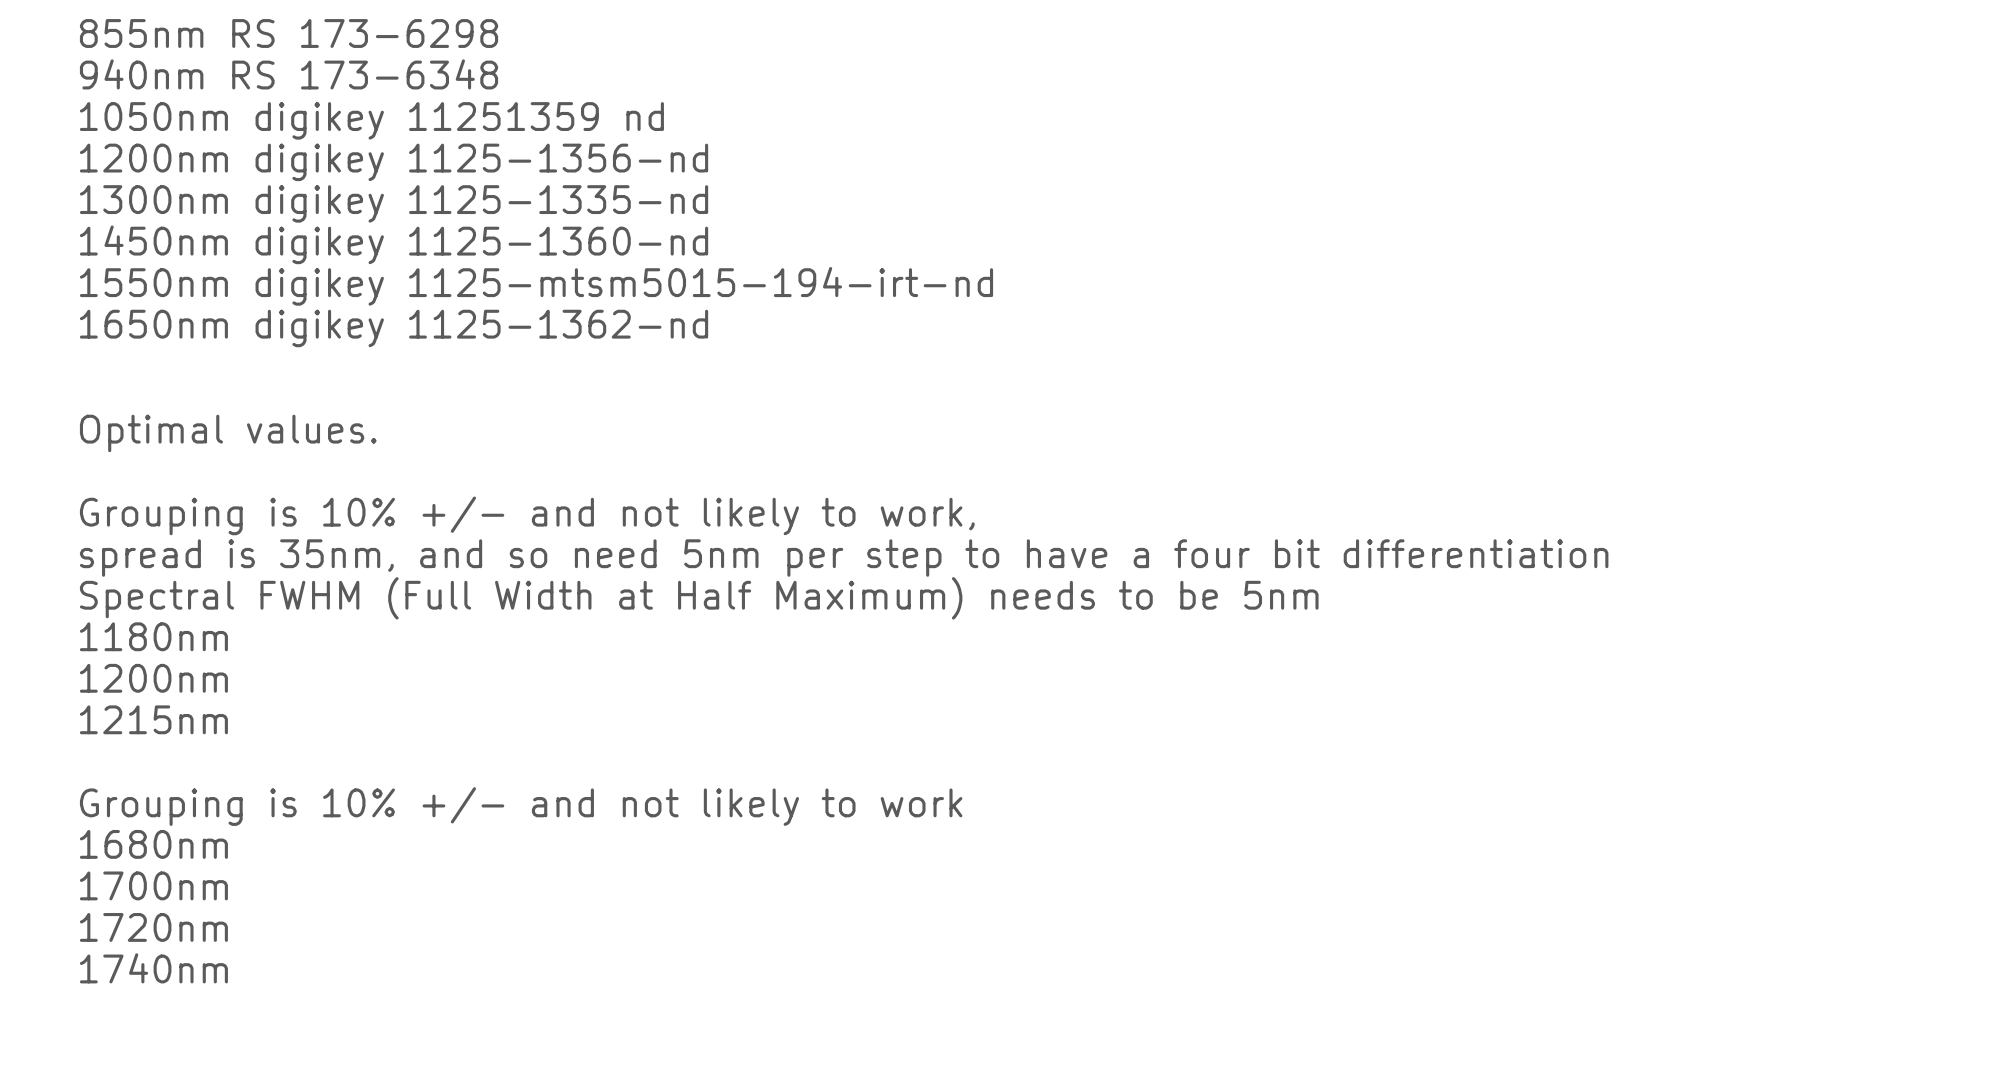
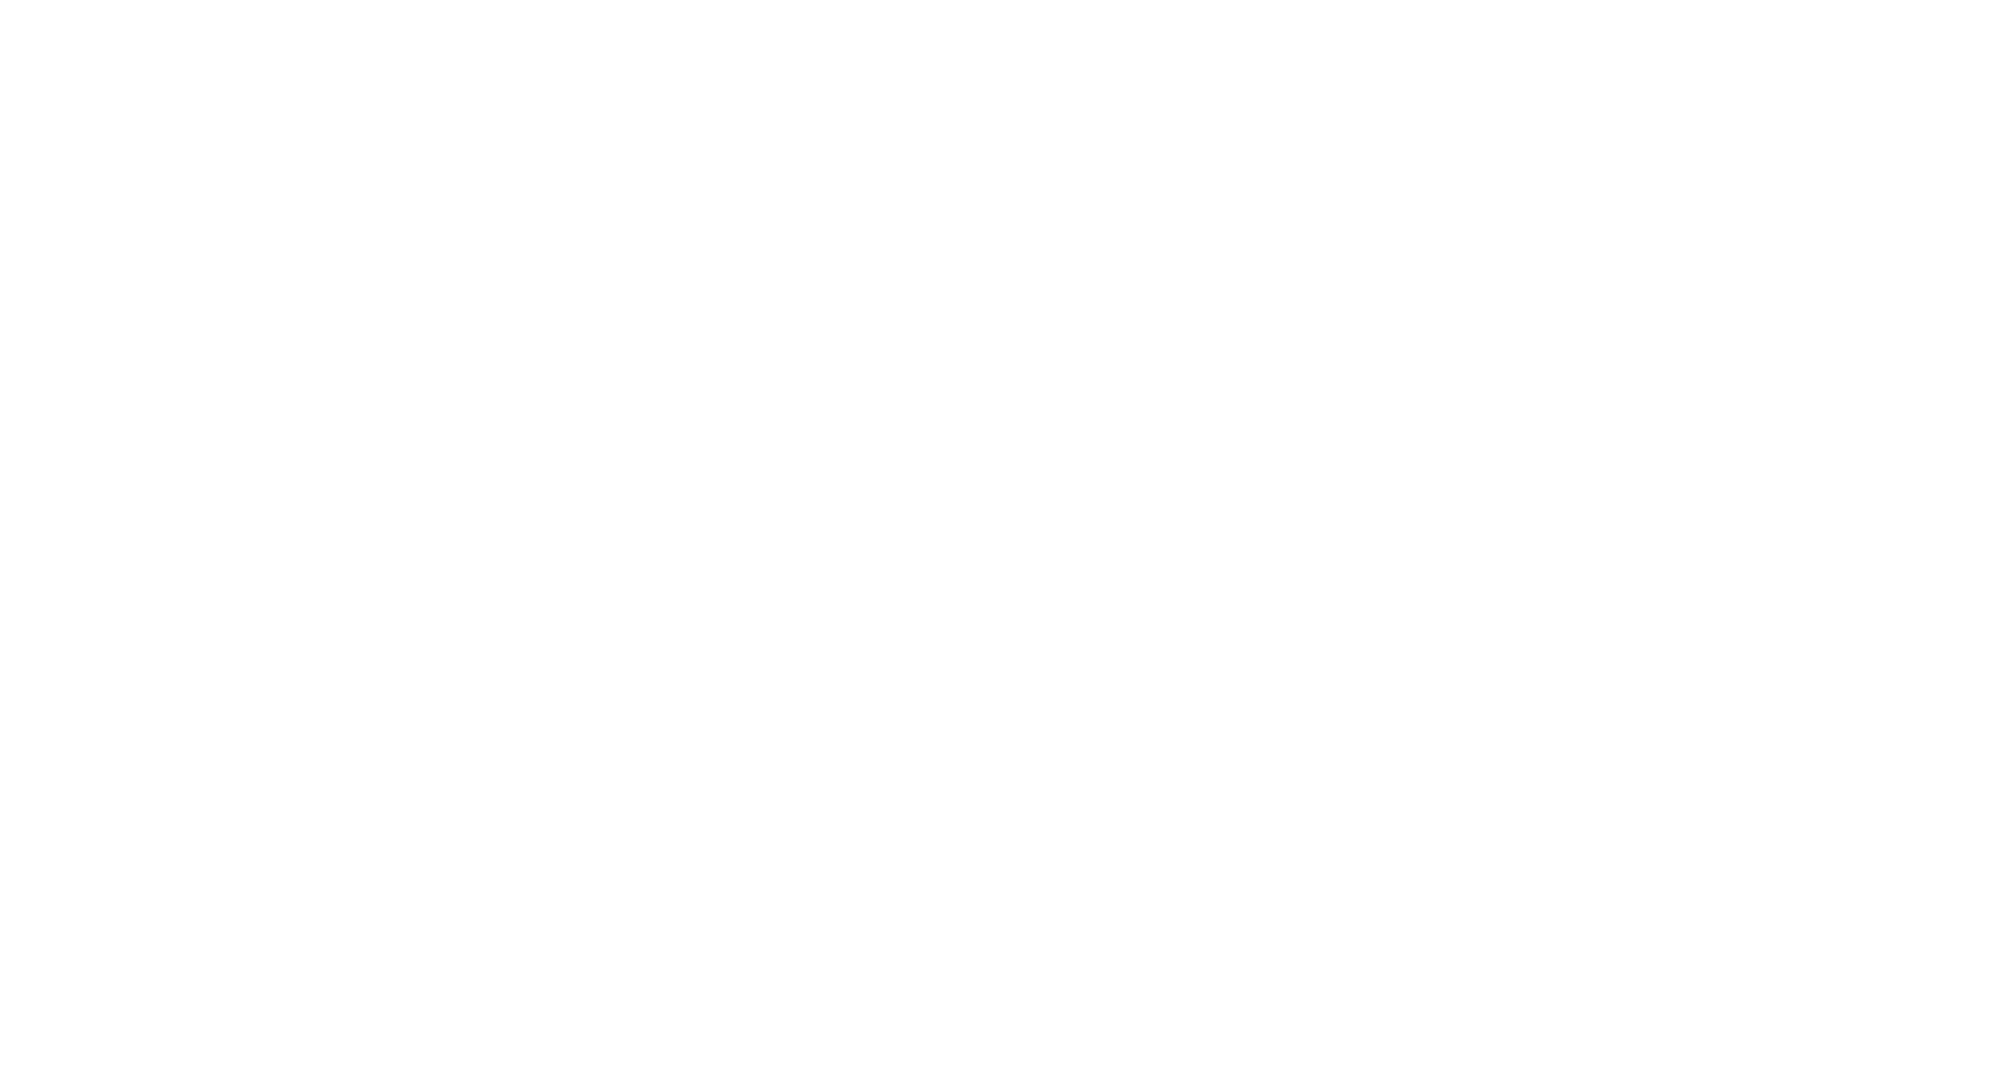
text: 855nm RS 173-6298 (289, 33) -> none
text: 940nm RS 173-6348 (289, 74) -> none
text: 1050nm digikey 11251359 nd (371, 120) -> none
text: 1200nm digikey 1125-1356-nd (394, 162) -> none
text: 1300nm digikey 1125-1335-nd (394, 203) -> none
text: 1450nm digikey 1125-1360-nd (394, 244) -> none
text: 1550nm digikey 1125-mtsm5015-194-irt-nd (536, 286) -> none
text: 1650nm digikey 1125-1362-nd (394, 328) -> none
text: Optimal values. (228, 433) -> none
text: Grouping is 10% +/- and not likely to work, (527, 515) -> none
text: spread is 35nm, and so need 5nm per step to have a four bit differentiation (844, 558) -> none
text: Spectral FWHM (Full Width at Half Maximum) needs to be 5nm (699, 598) -> none
text: 1180nm (153, 636) -> none
text: 1200nm (153, 678) -> none
text: 1215nm (153, 719) -> none
text: Grouping is 10% +/- and not likely to work (521, 806) -> none
text: 1680nm (153, 844) -> none
text: 1700nm (153, 885) -> none
text: 1720nm (153, 927) -> none
text: 1740nm (153, 968) -> none

